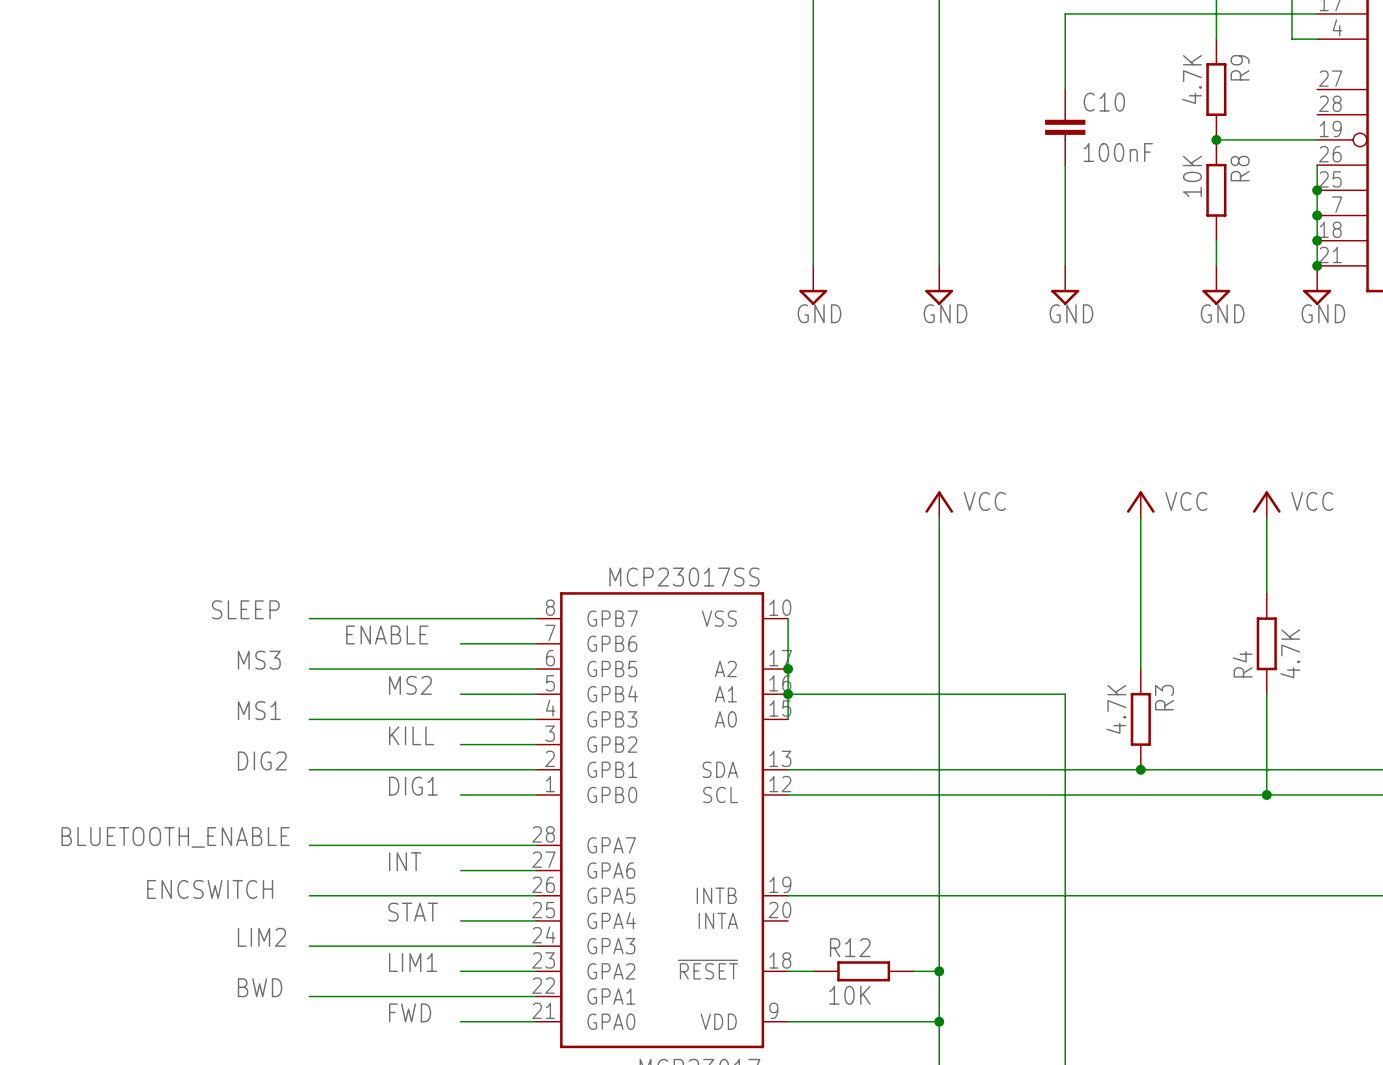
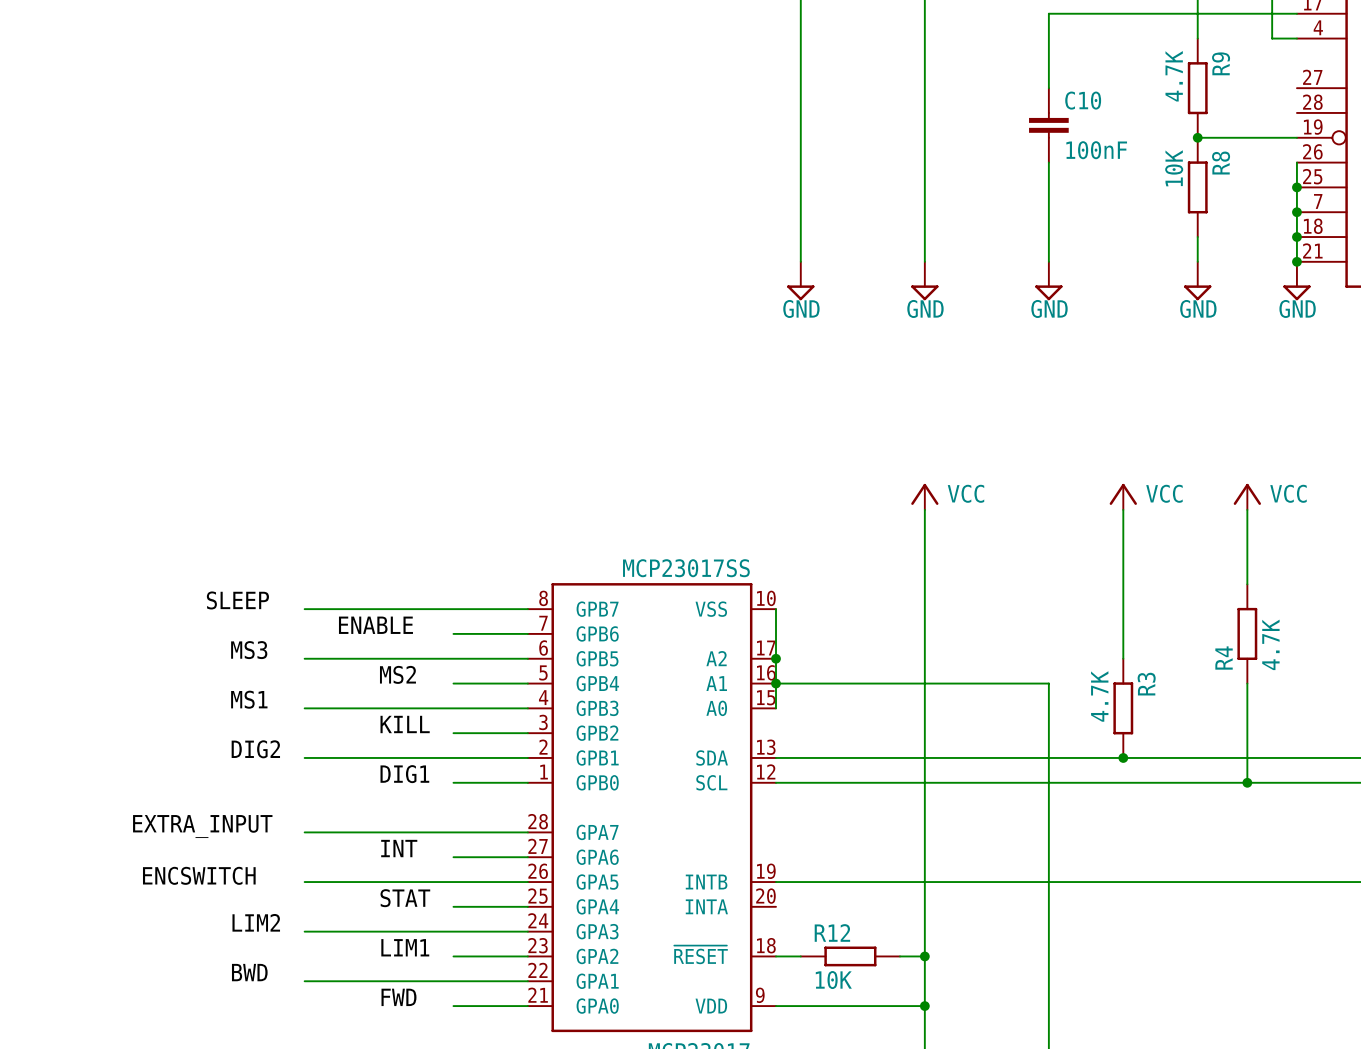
label: BLUETOOTH_ENABLE (175, 837) -> none
label: none -> EXTRA_INPUT (202, 826)

